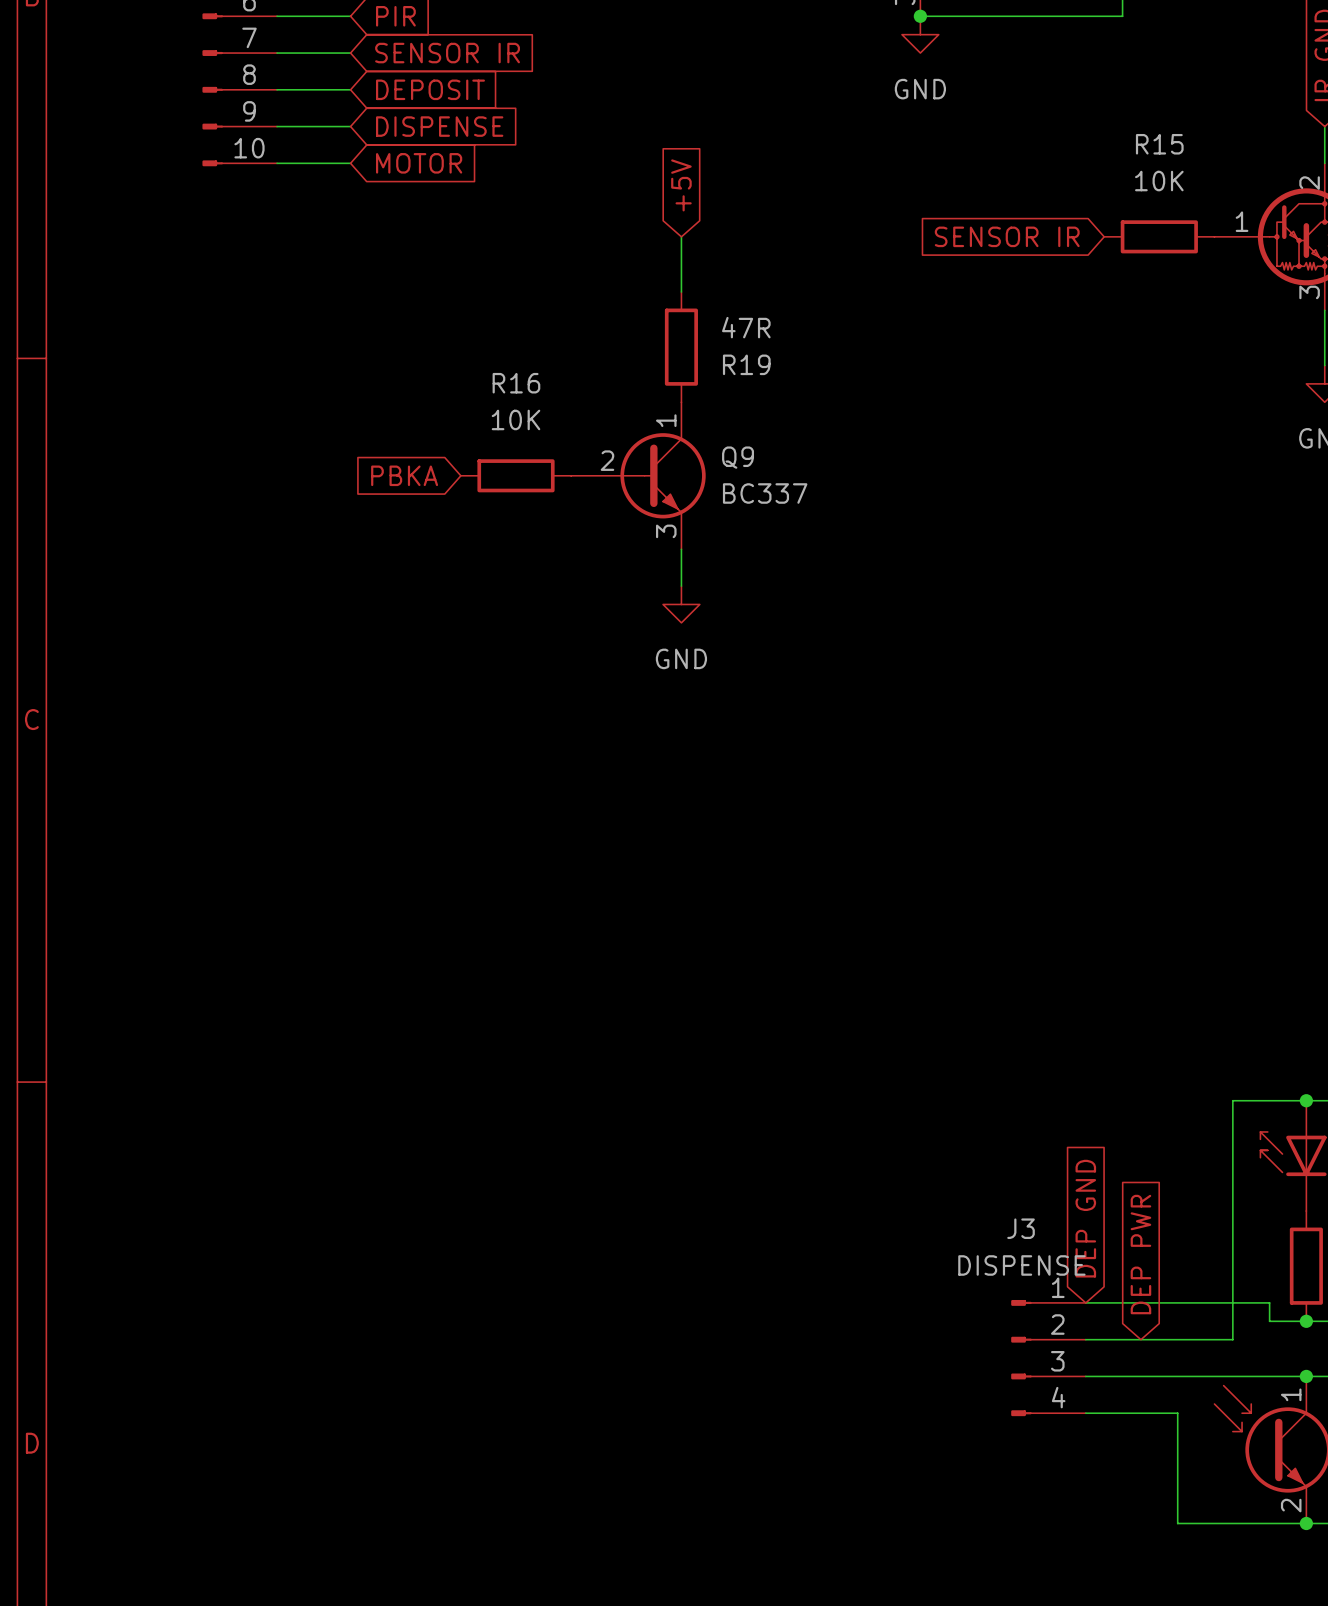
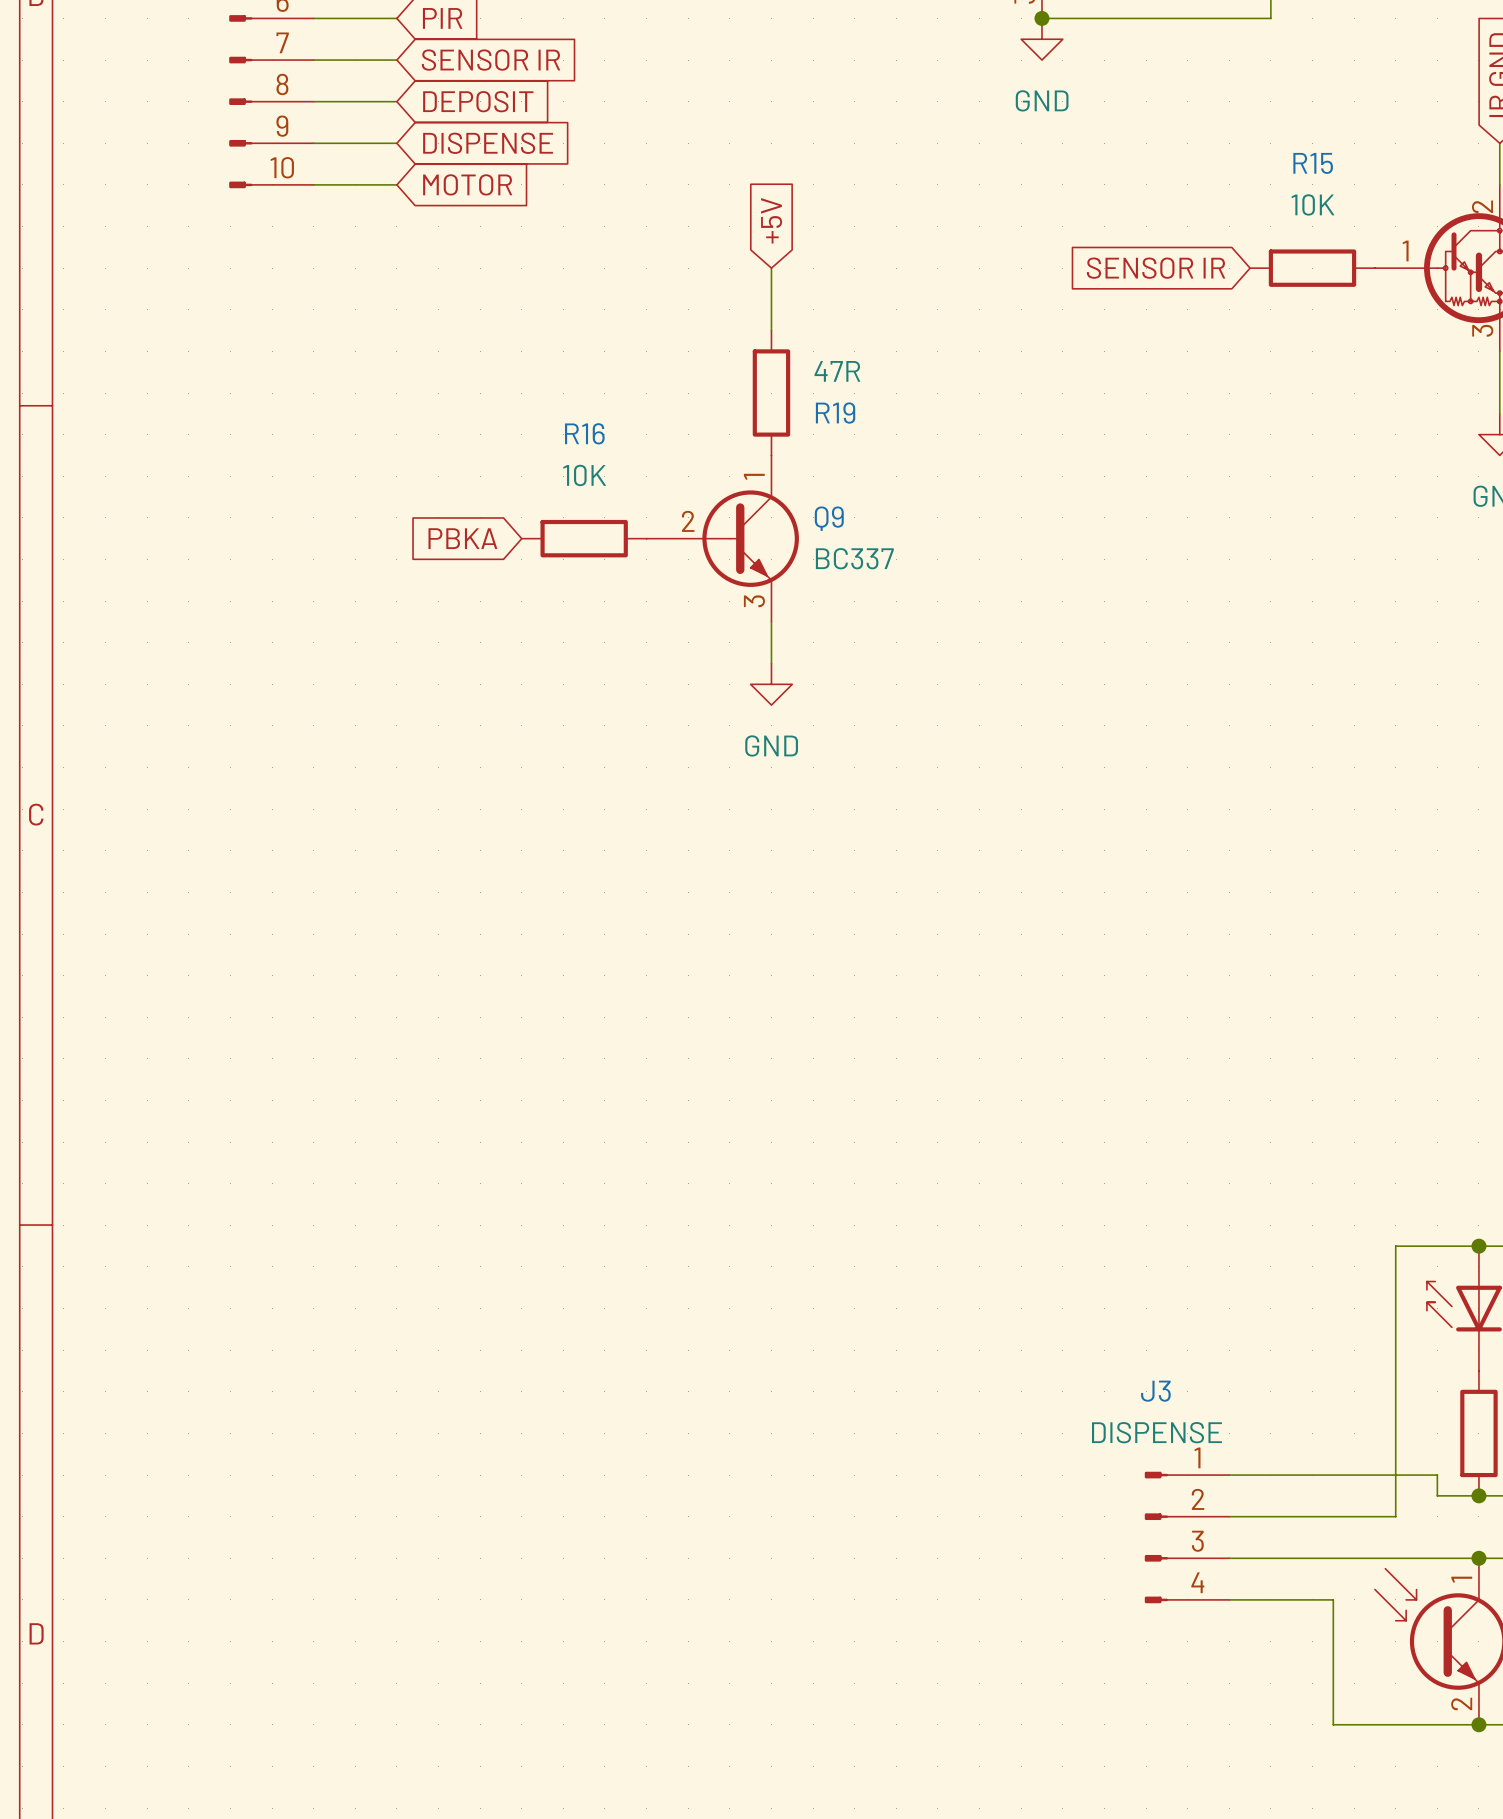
global label: DEP GND (1085, 1218) -> none
global label: DEP PWR (1140, 1254) -> none

